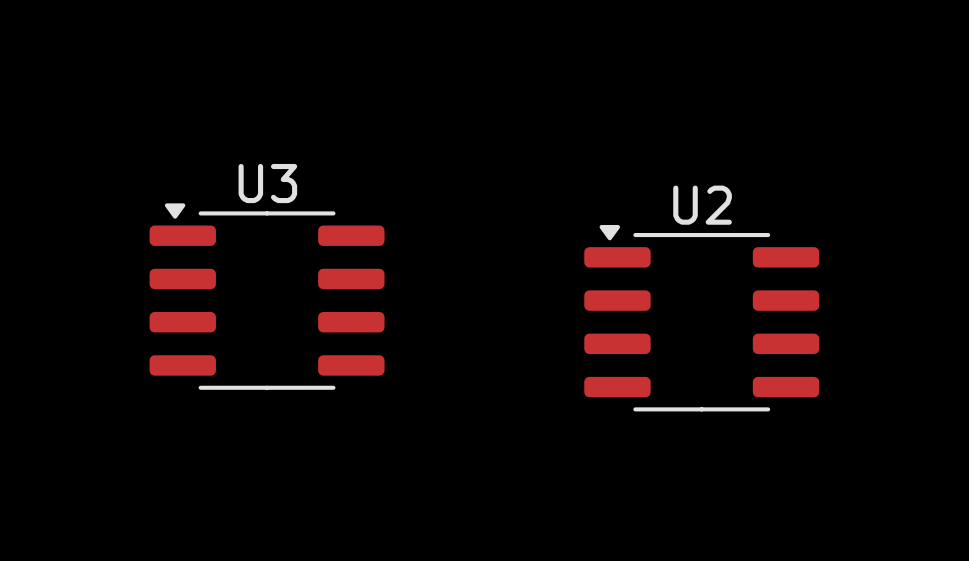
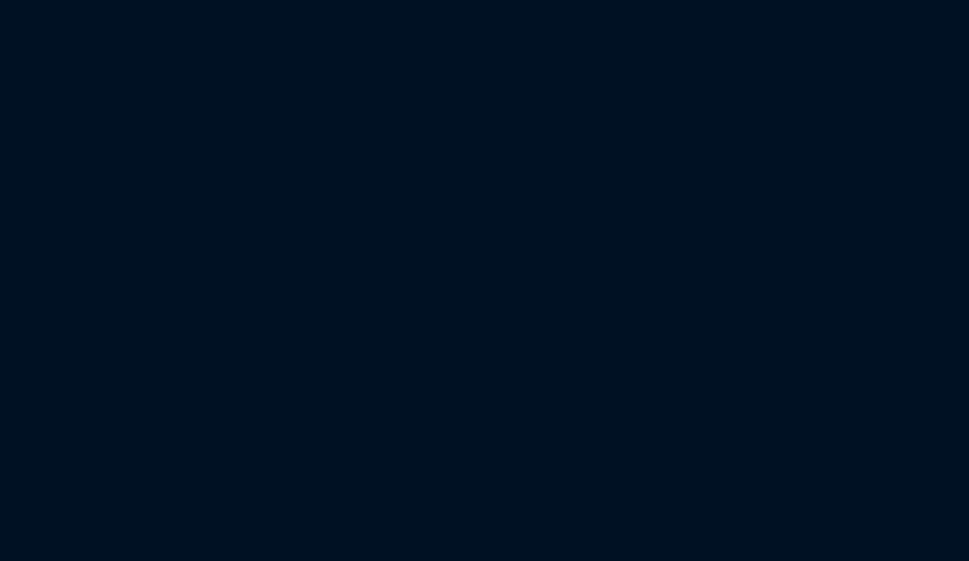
U3: (267, 296) -> none
U2: (701, 318) -> none

